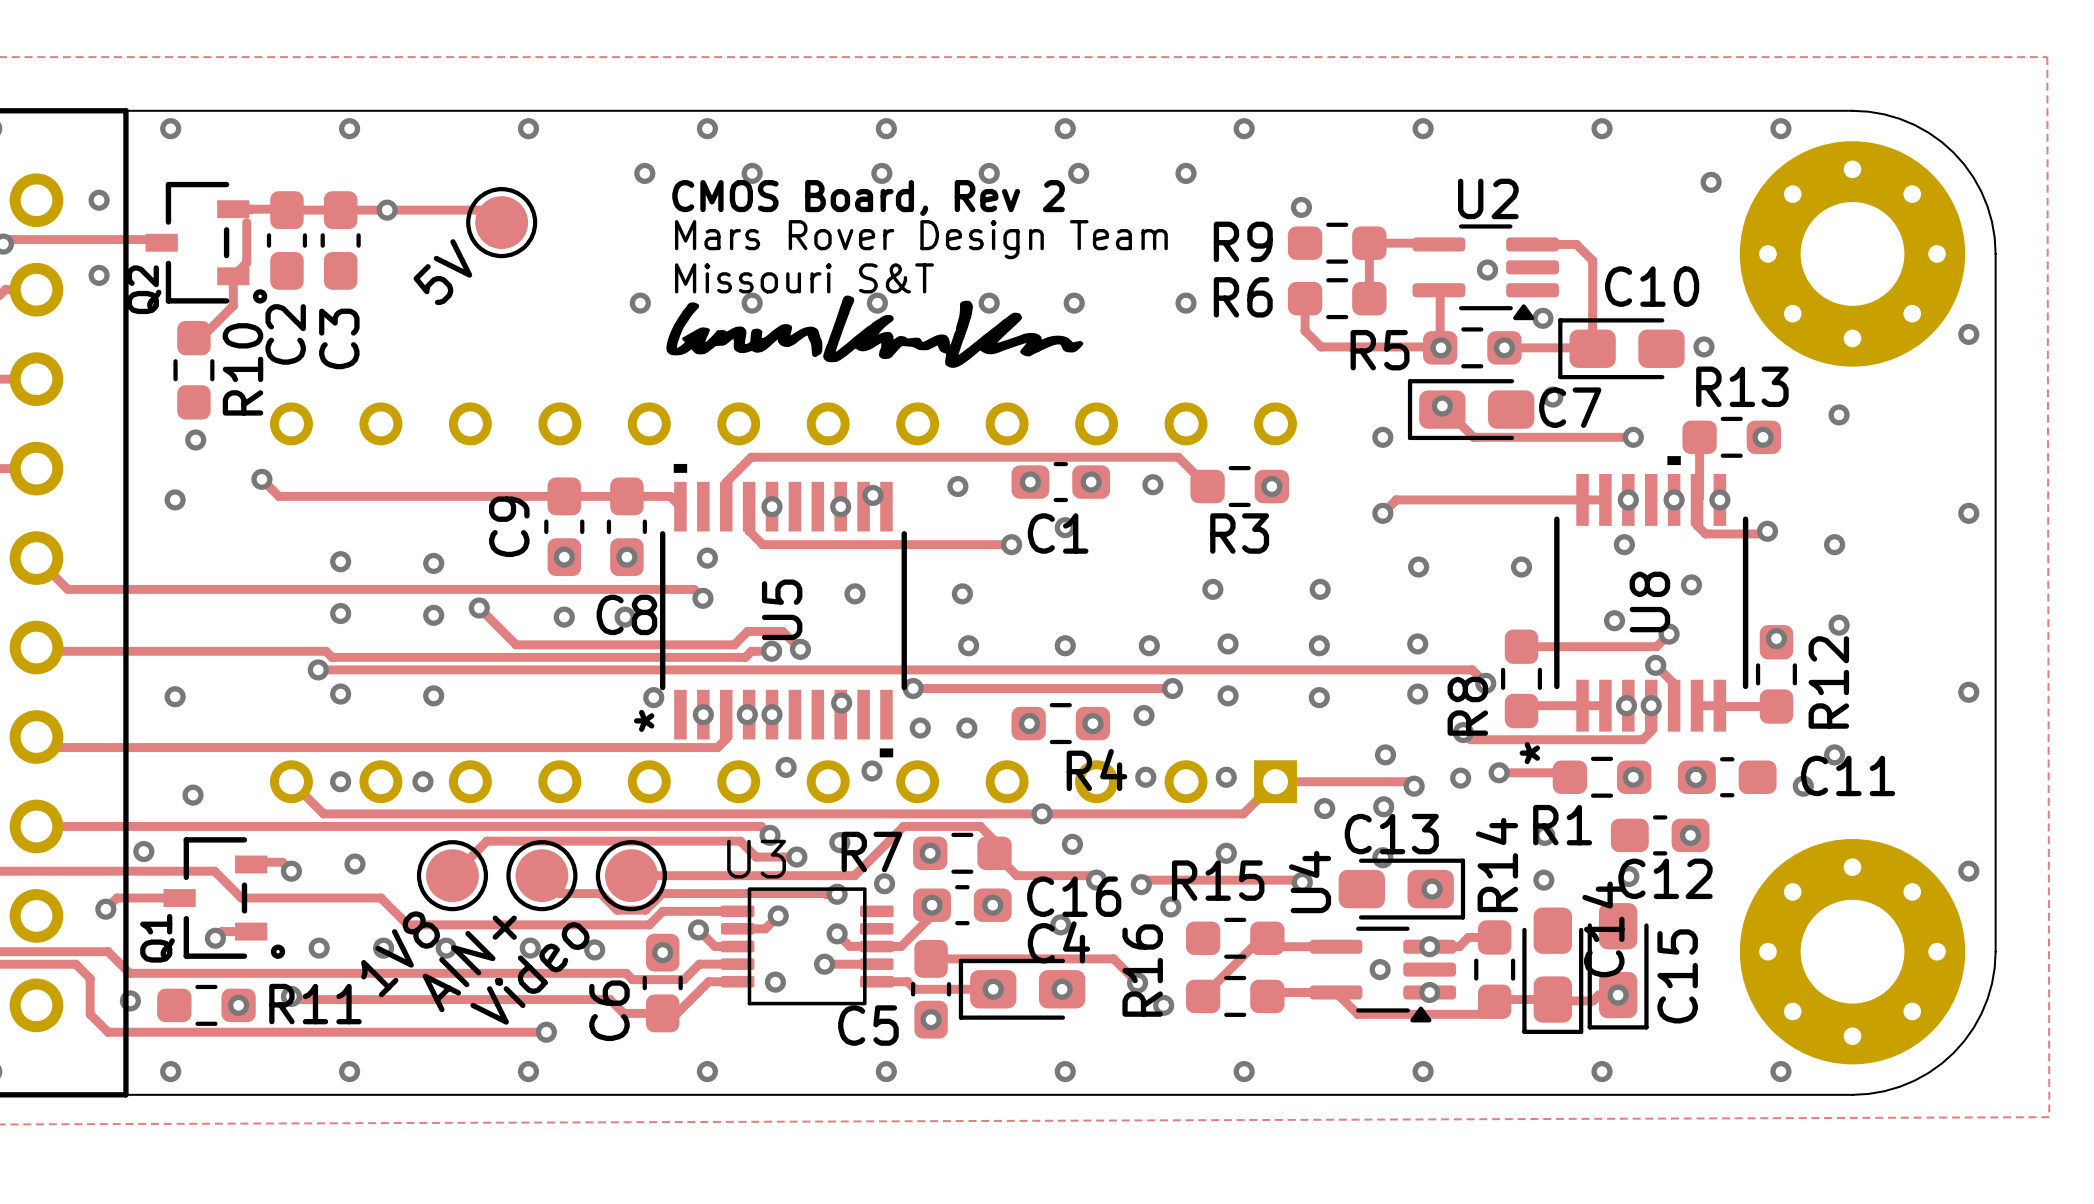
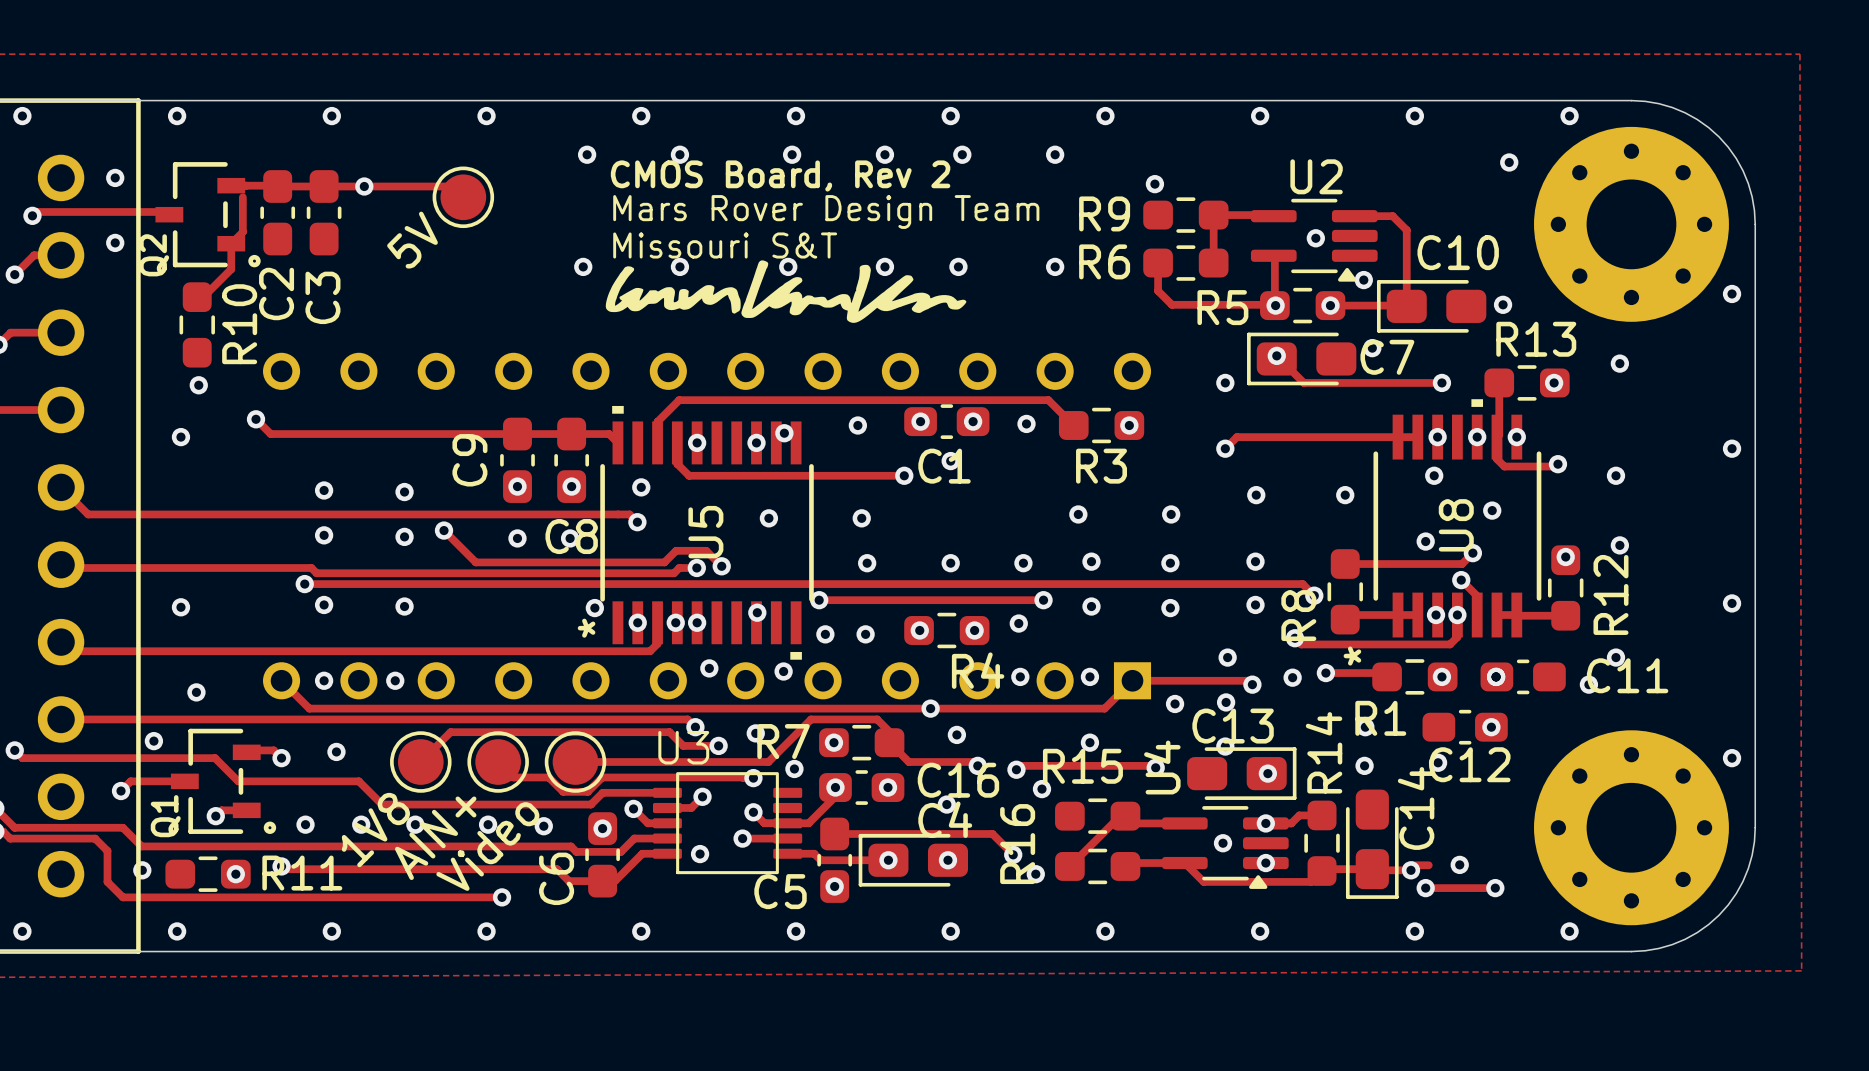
C15: (1618, 966) -> none
via: none -> (1459, 864)
via position: (1618, 995) -> (1410, 870)
track: none -> (1425, 888) (1495, 888)
via: none -> (1425, 888)
via: none -> (1495, 888)

